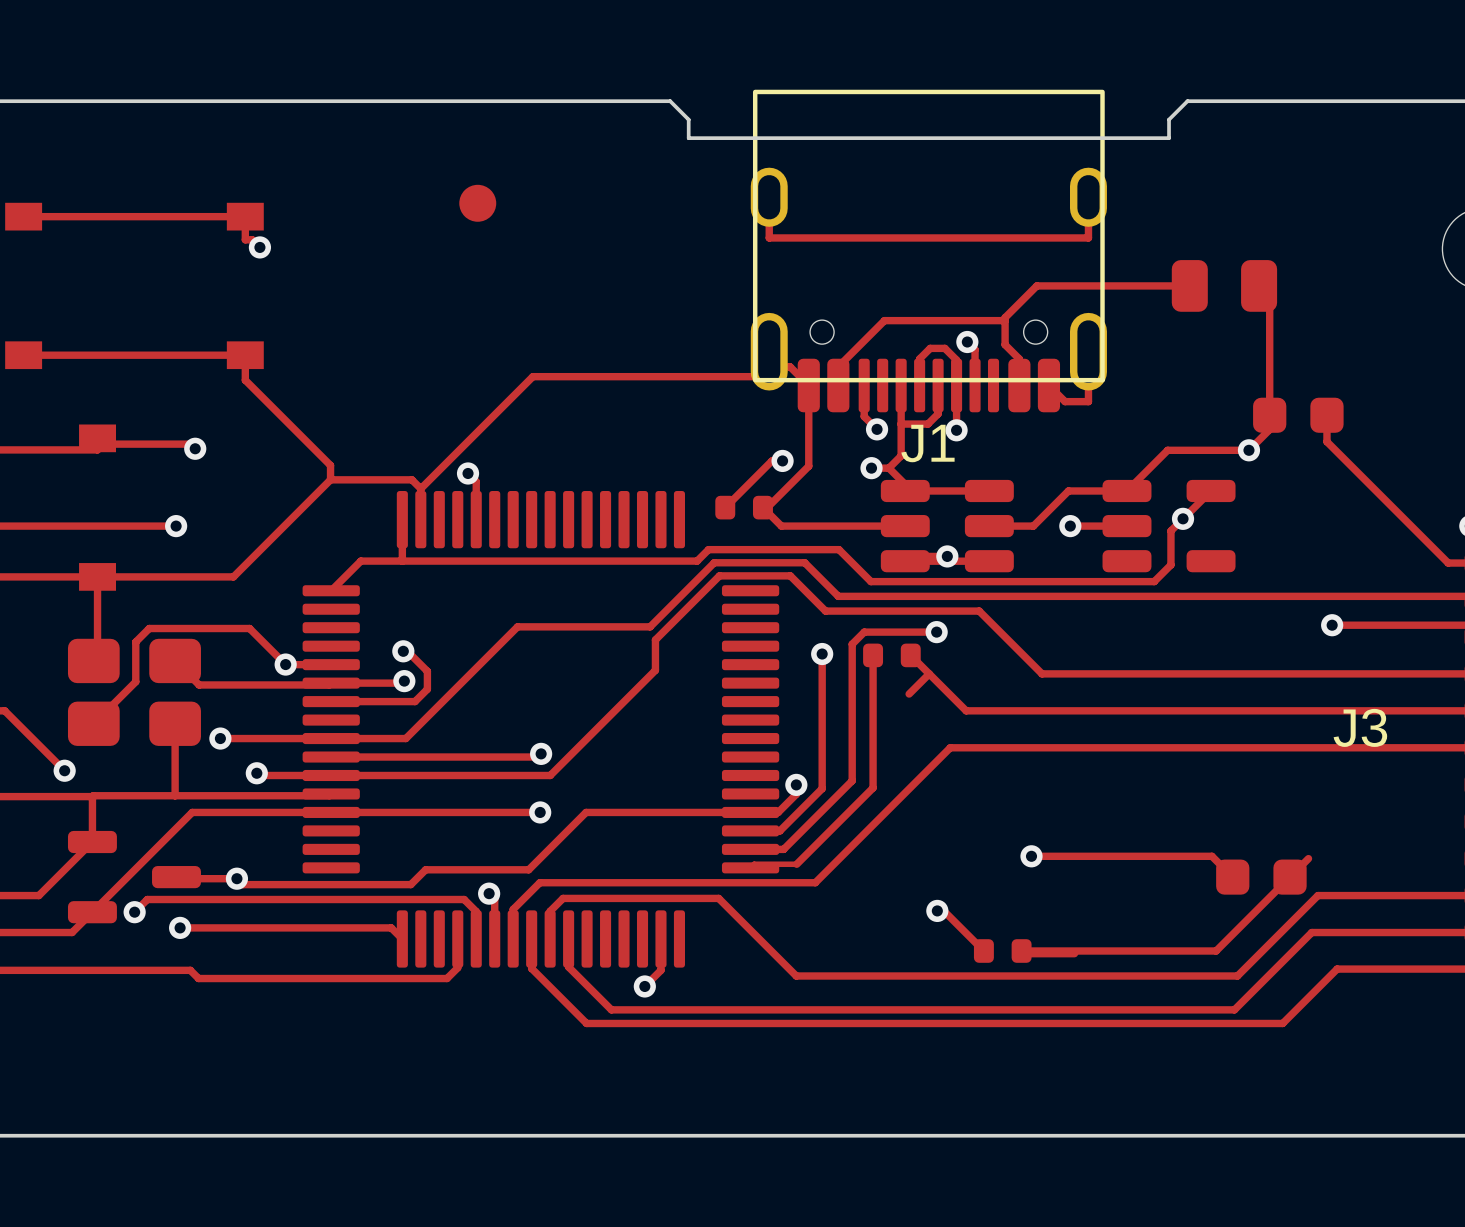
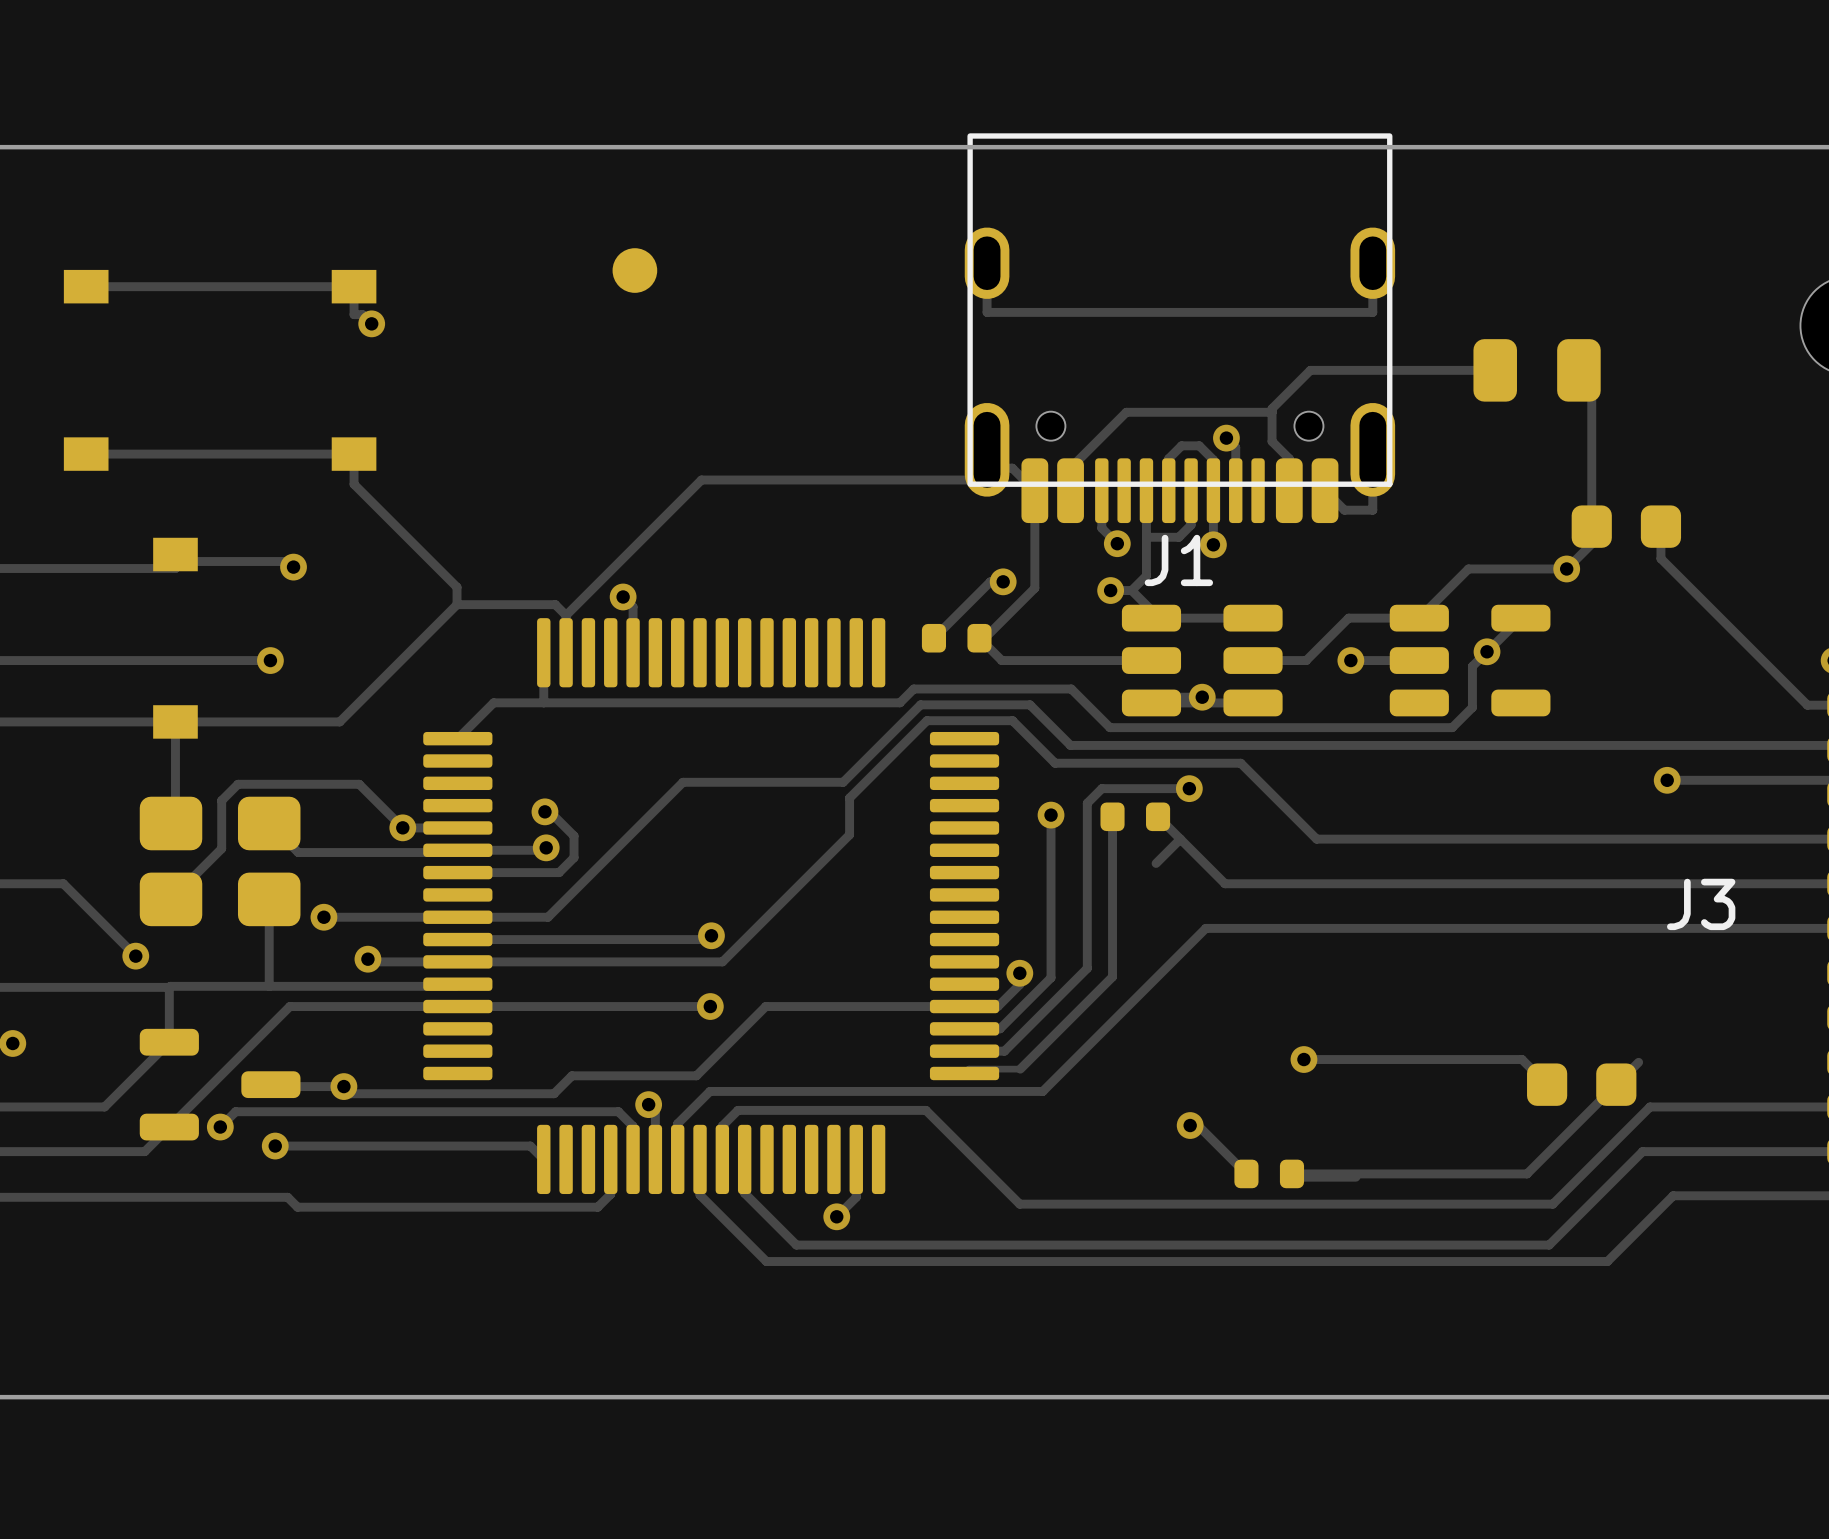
board edge: (670, 101) (688, 119) (688, 138) (1169, 138) (1169, 119) (1187, 101) -> (867, 147) (1492, 147)

